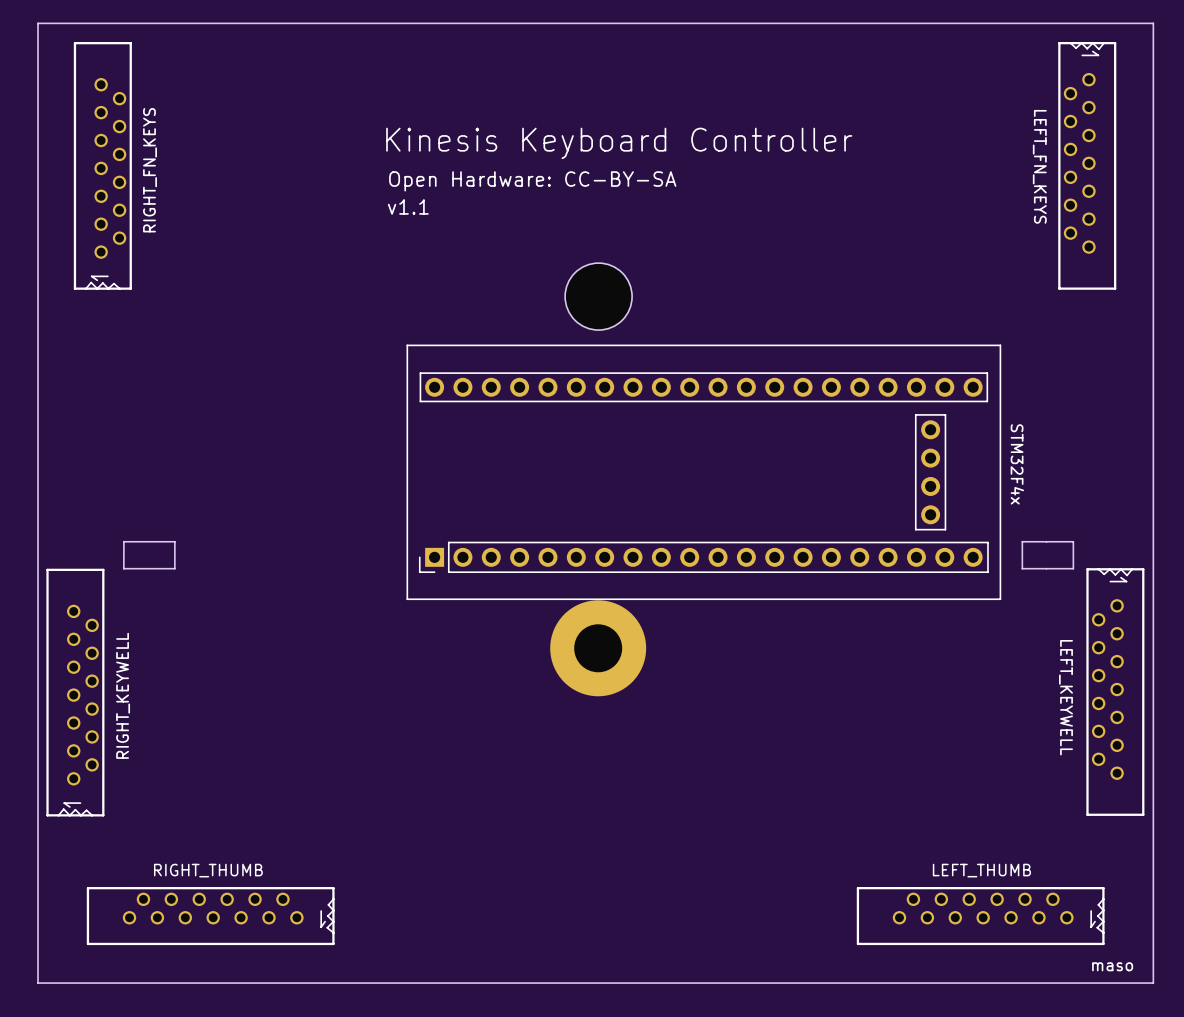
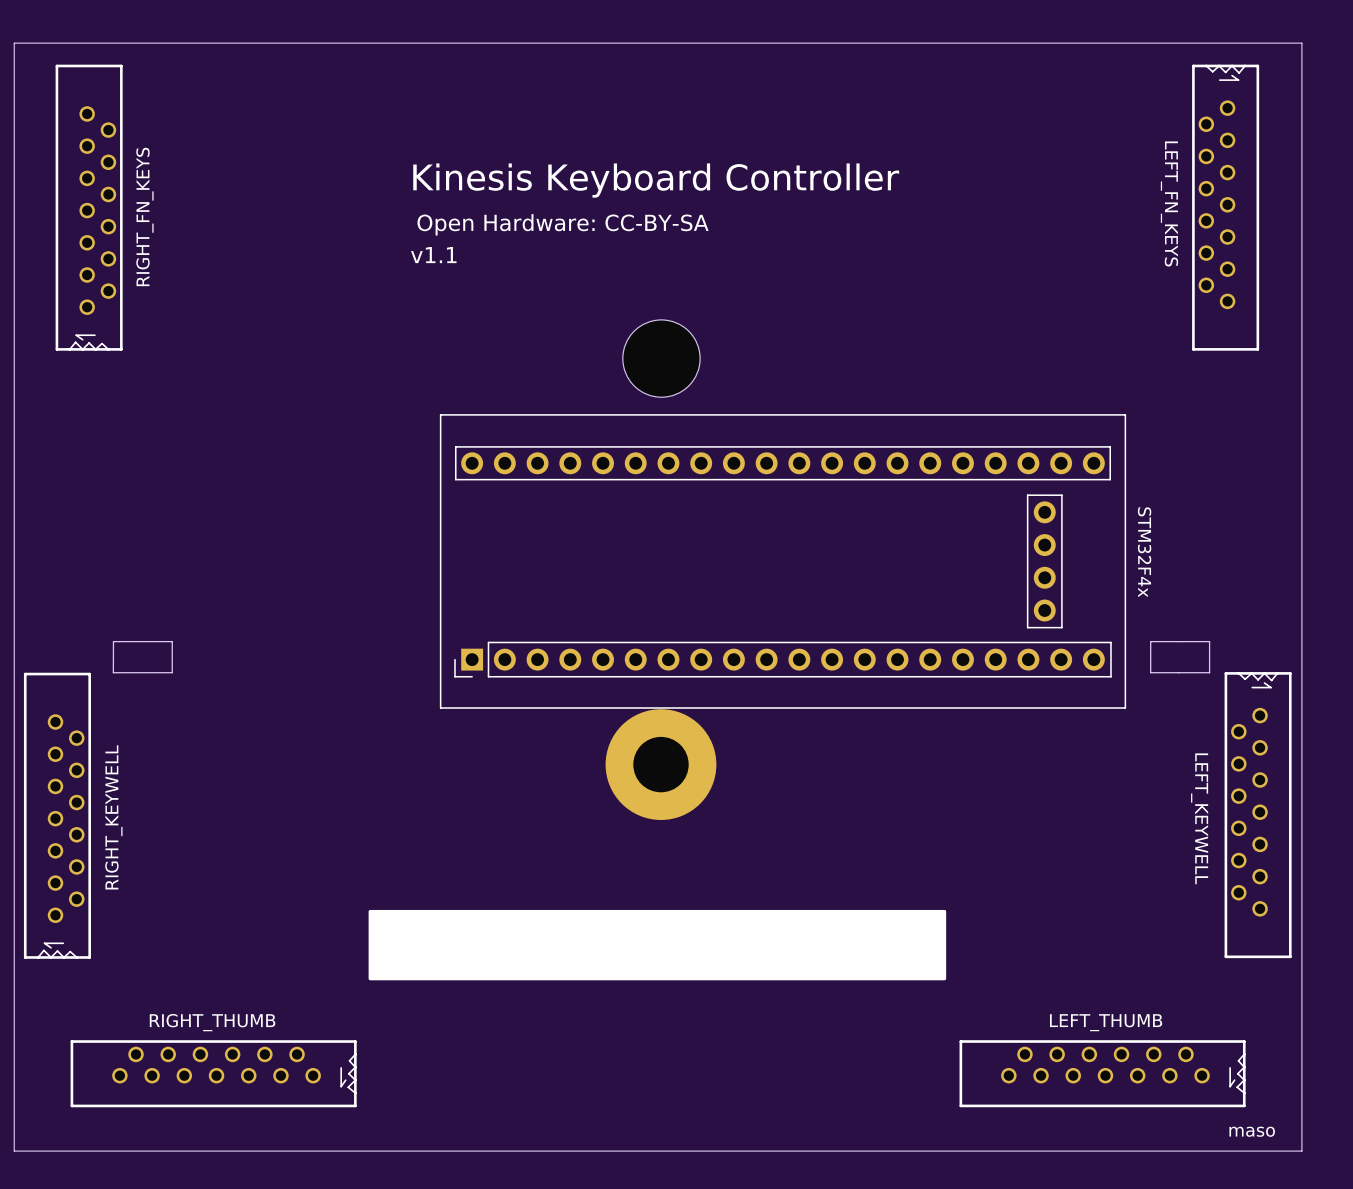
drawing: none -> [368, 909, 947, 981]

